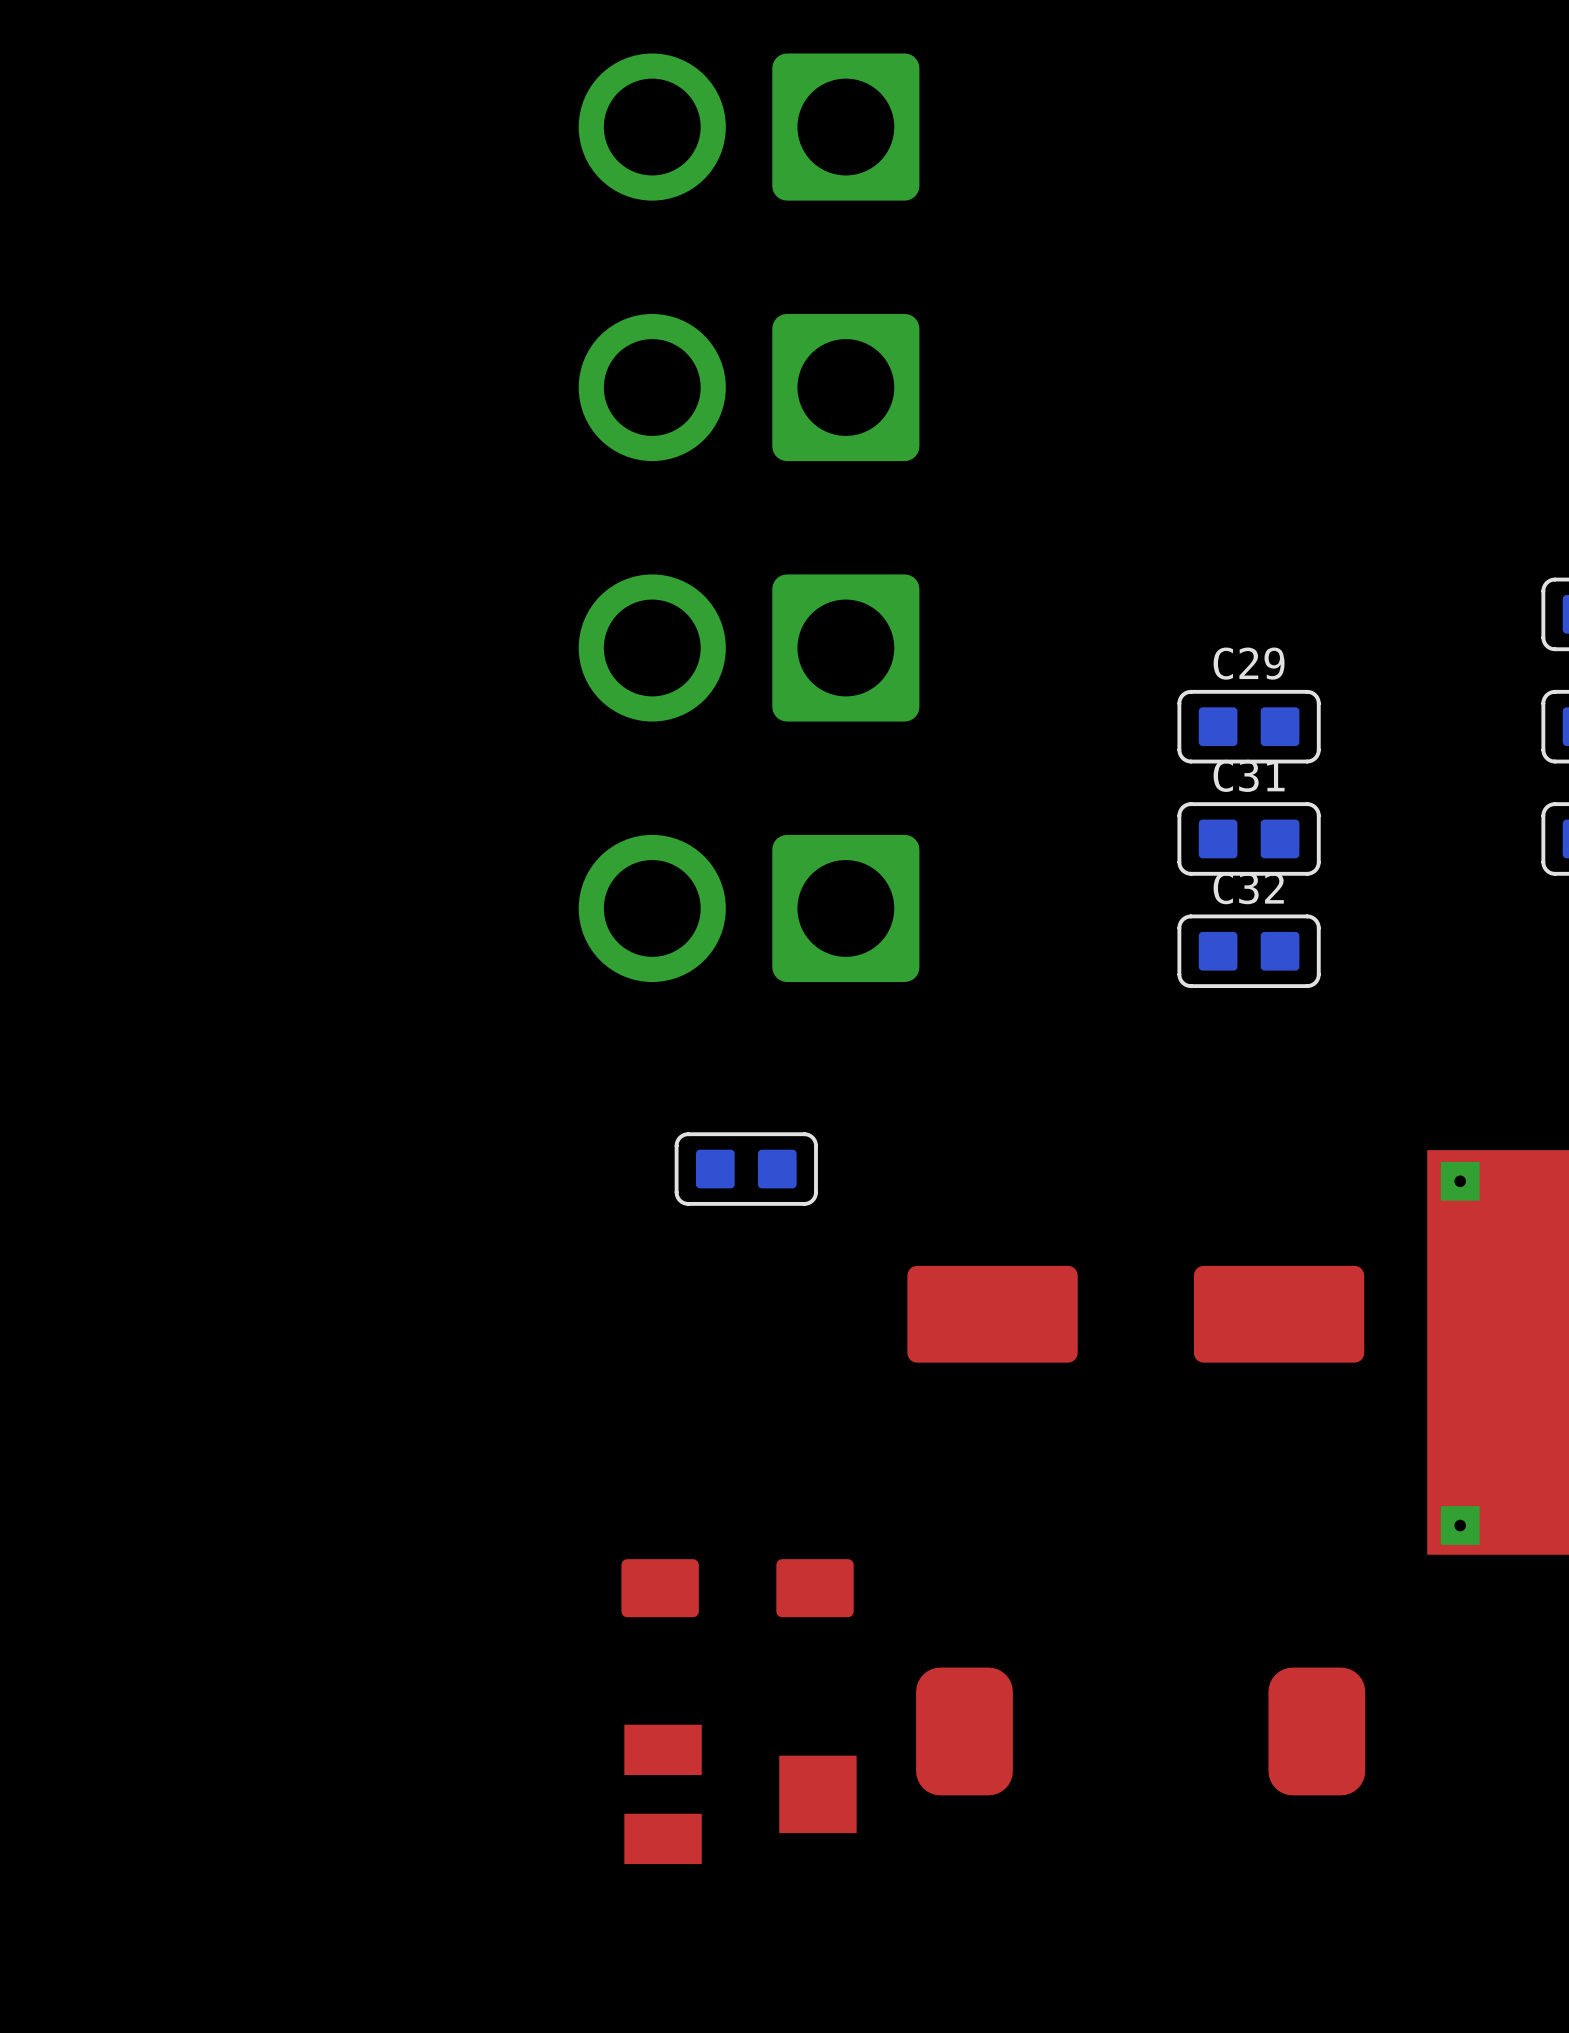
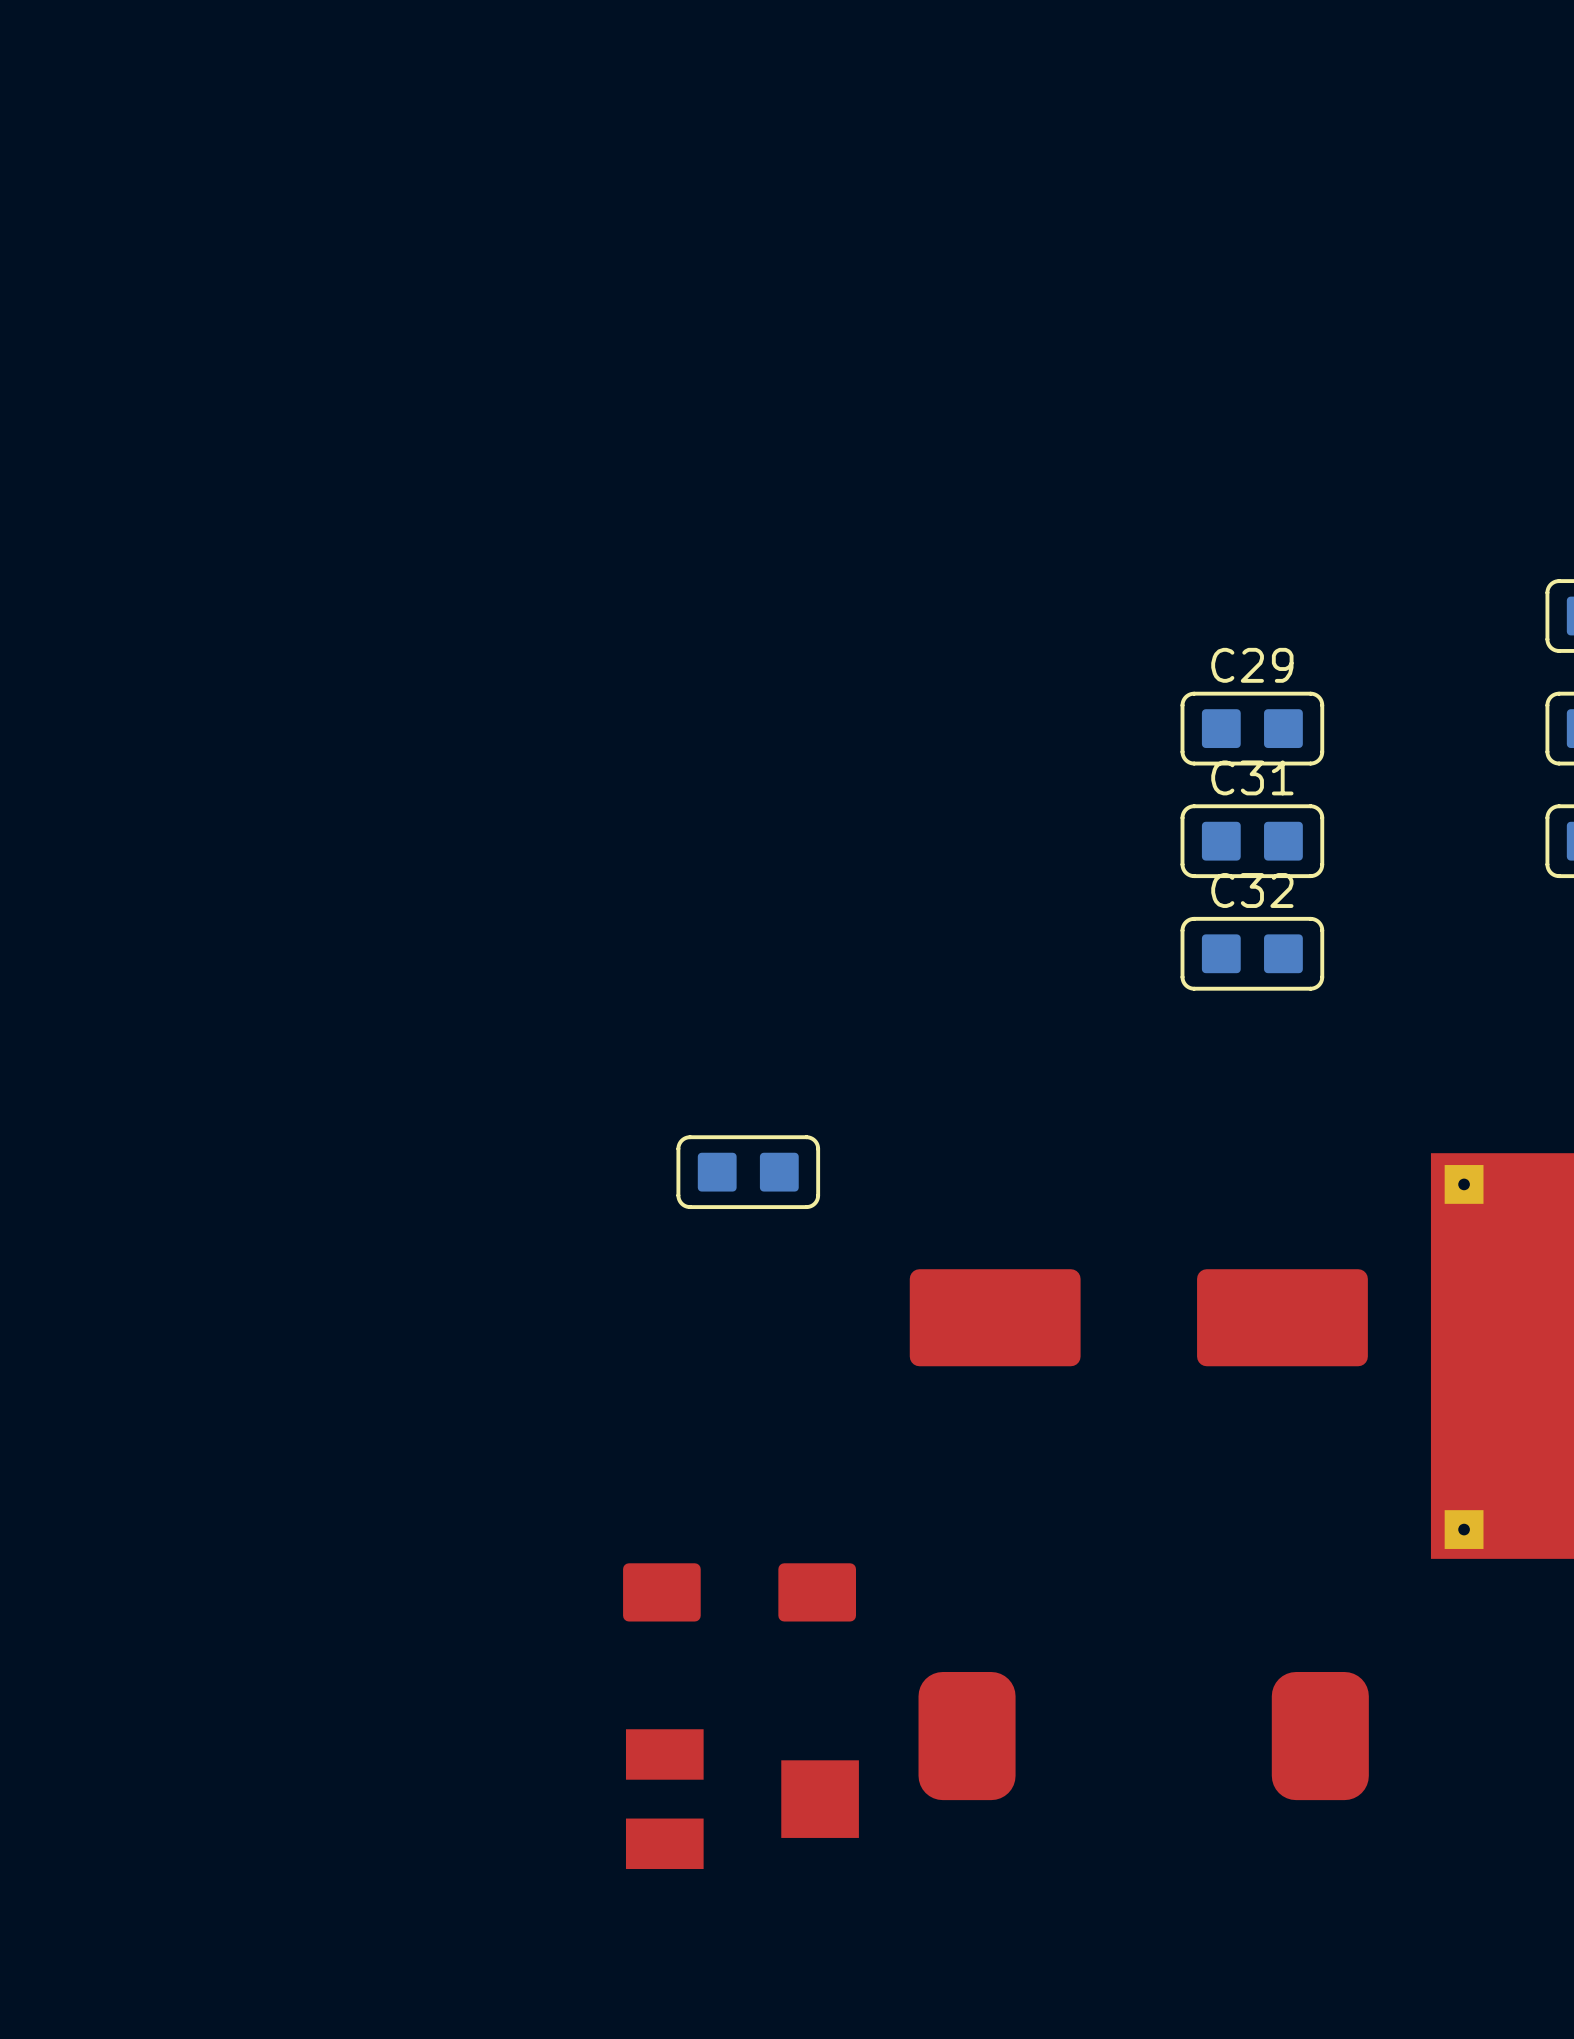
part: (749, 127) -> none
part: (749, 387) -> none
part: (749, 647) -> none
part: (749, 908) -> none

